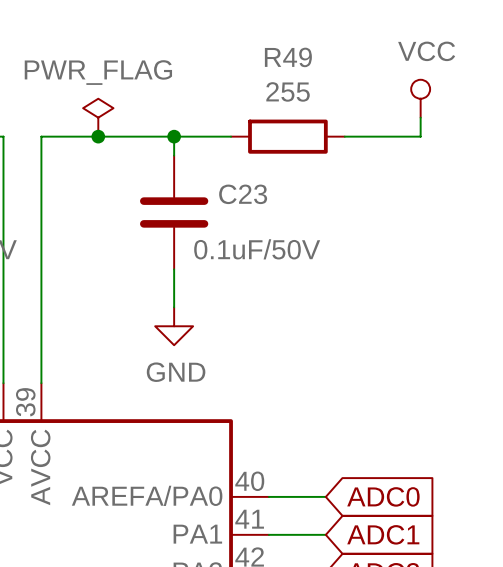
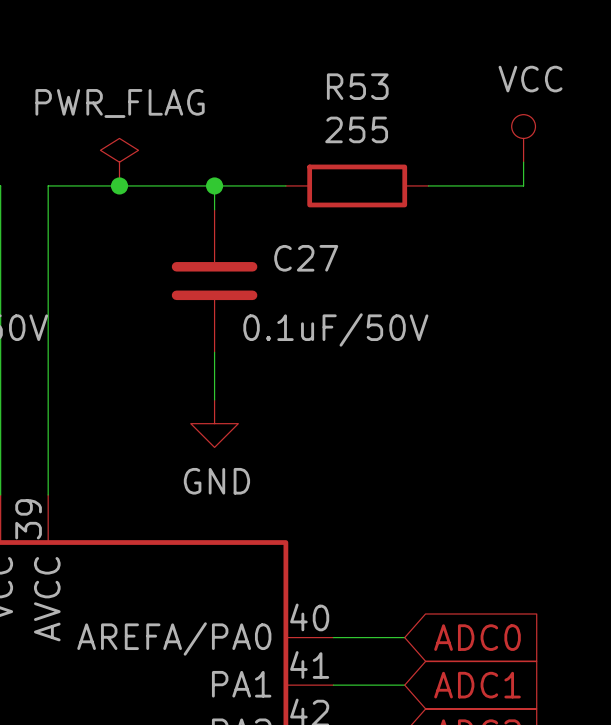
R49 name: R49 (288, 57) -> R53 (357, 86)
C23 name: C23 (243, 194) -> C27 (306, 258)

